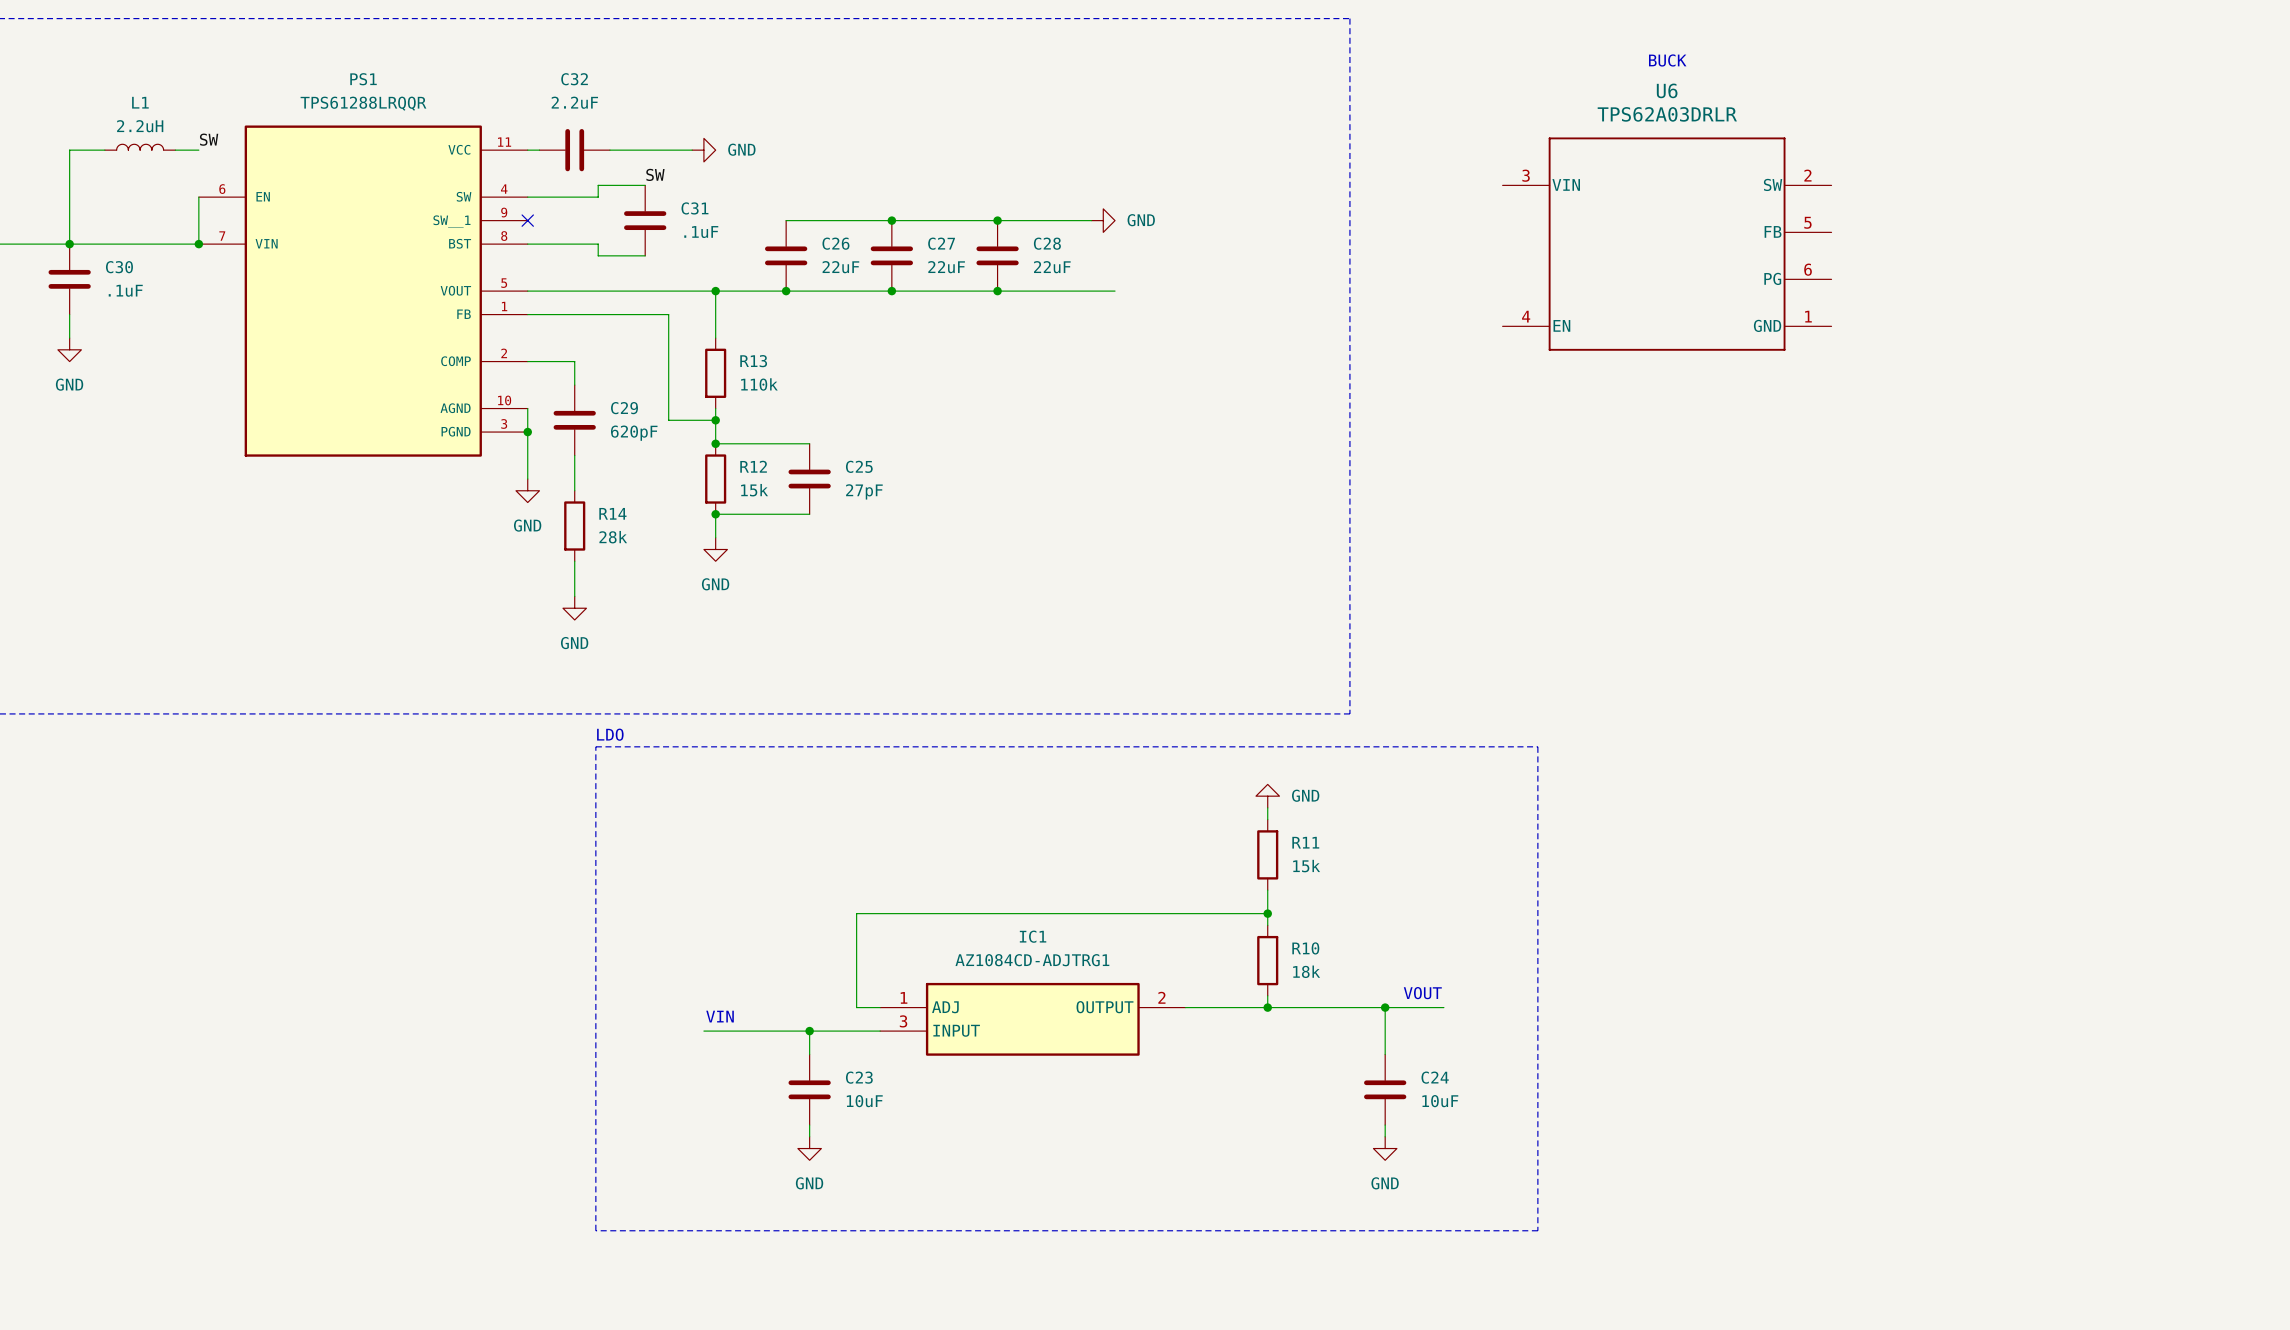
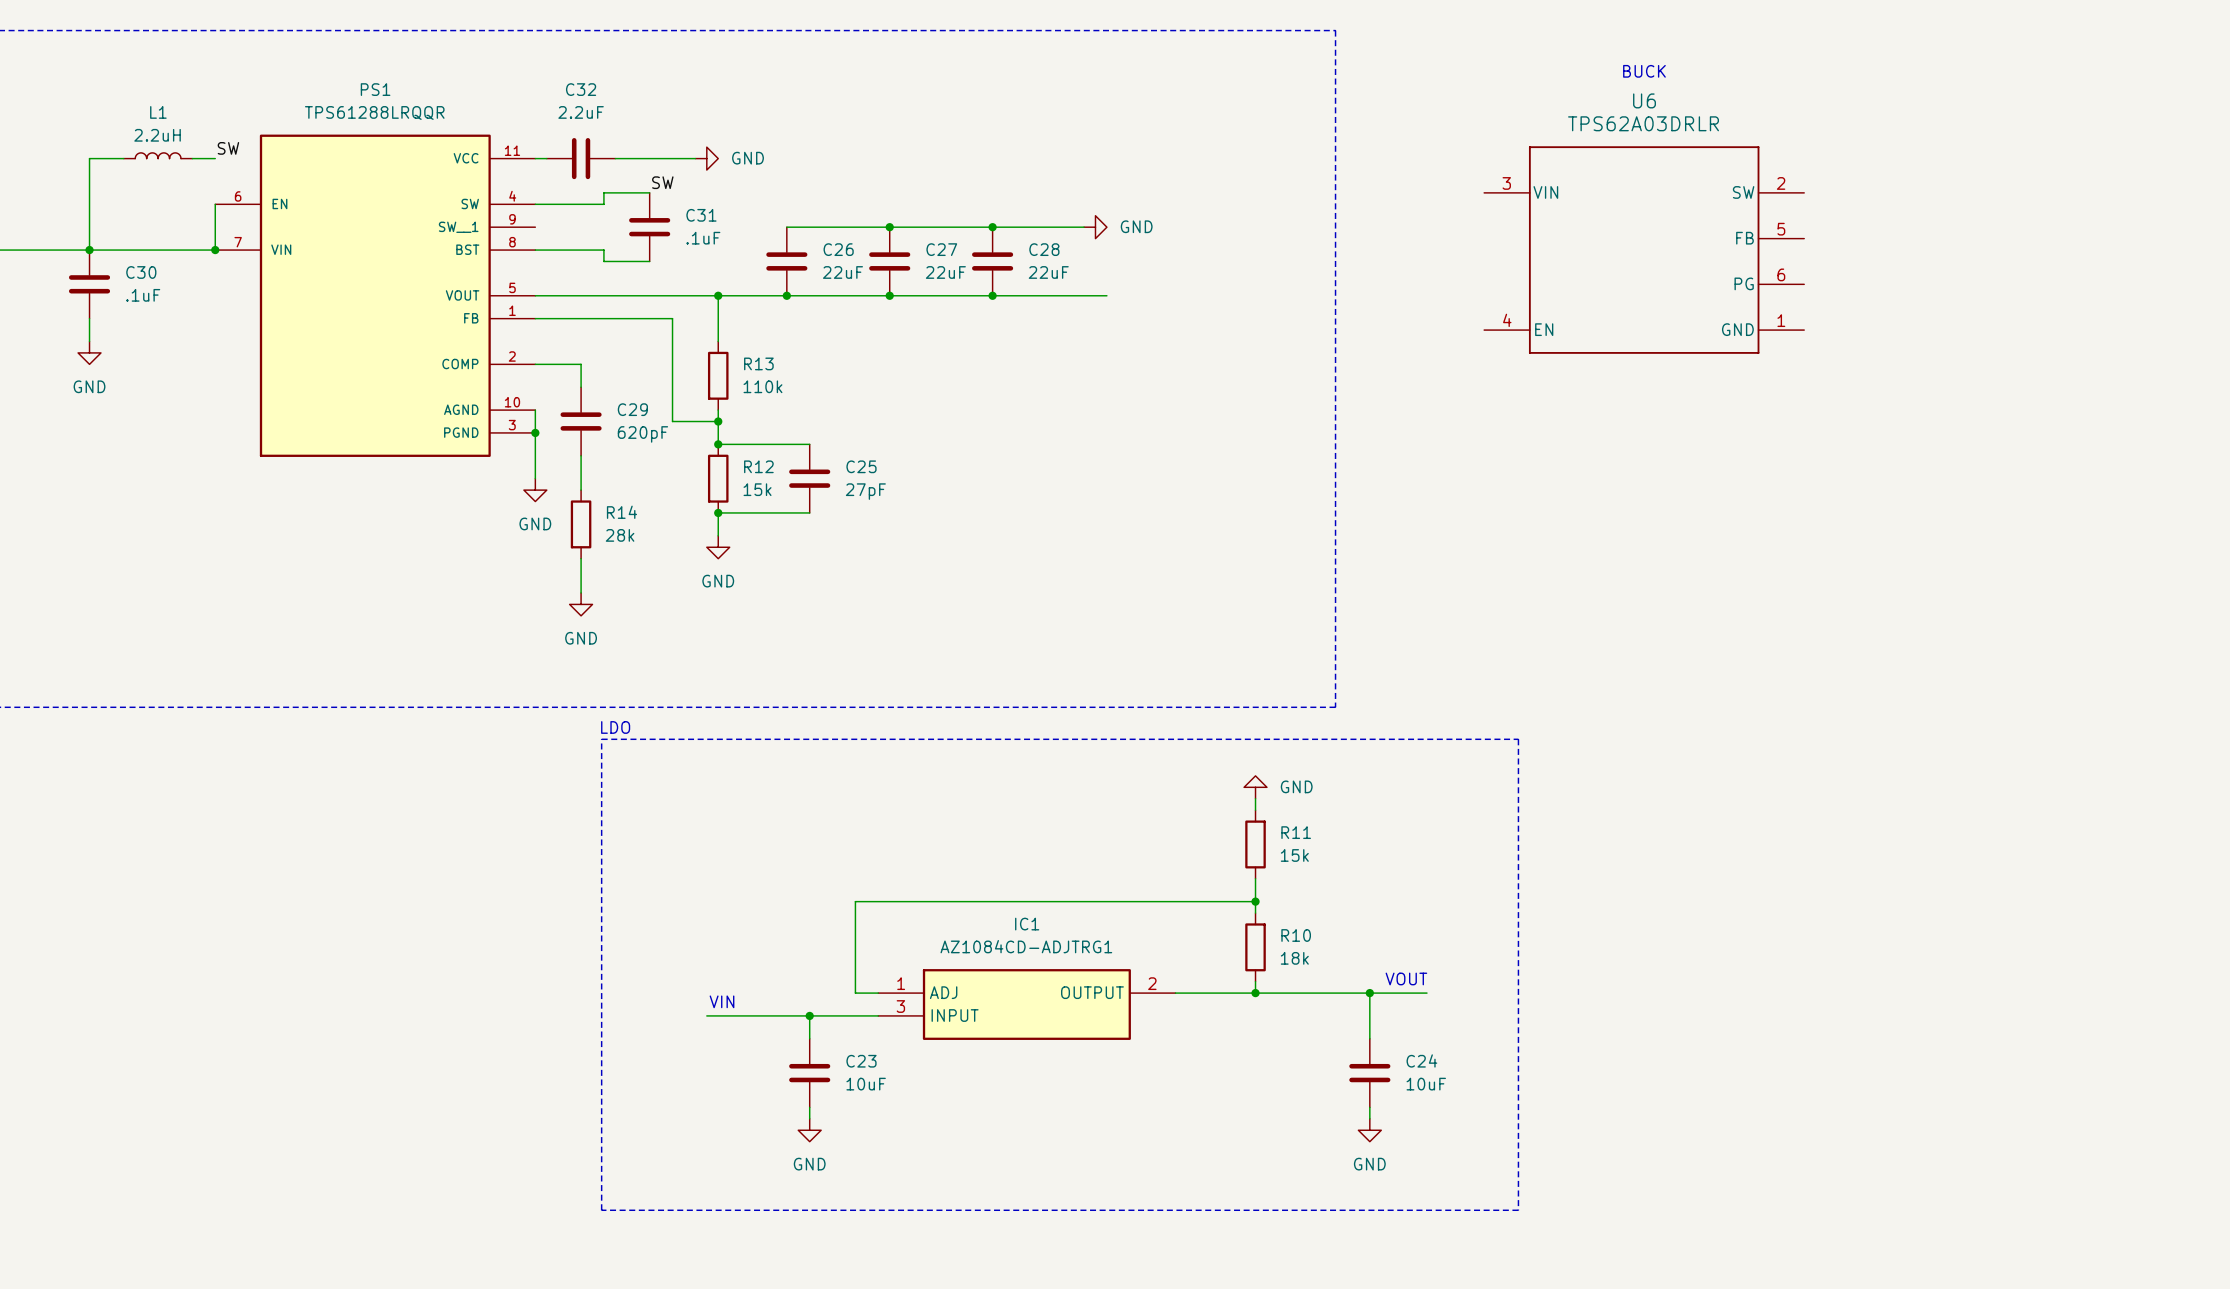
no-connect mark: (527, 220) -> none

